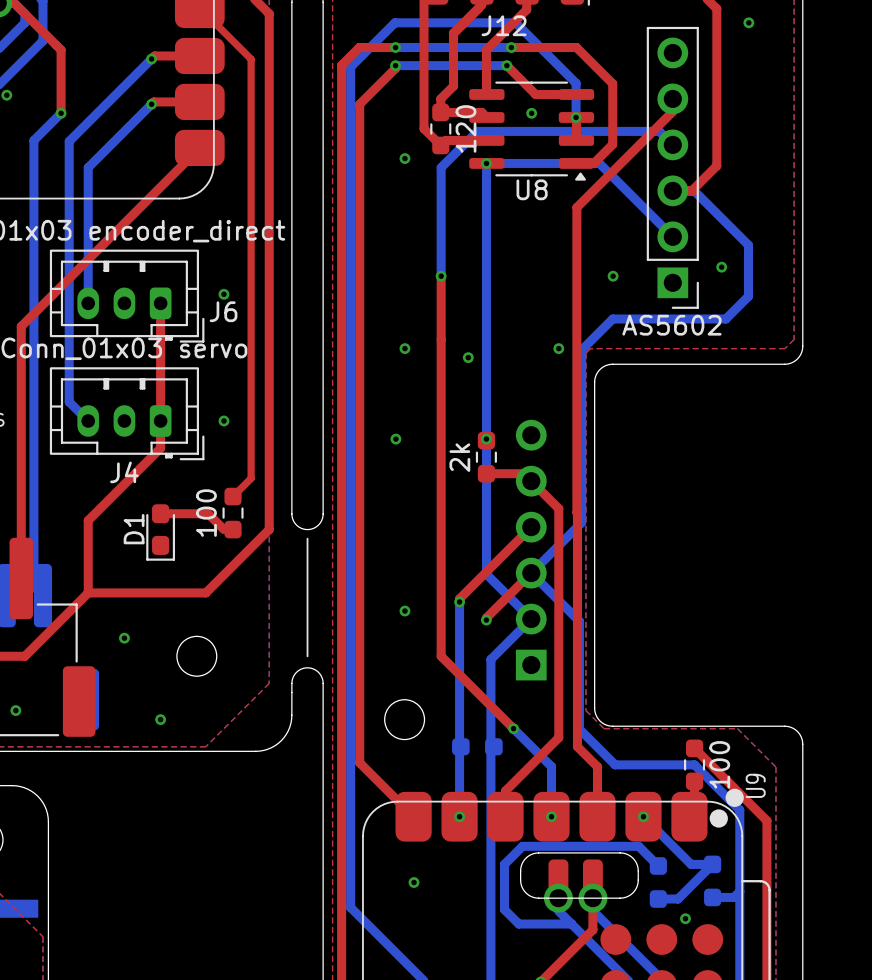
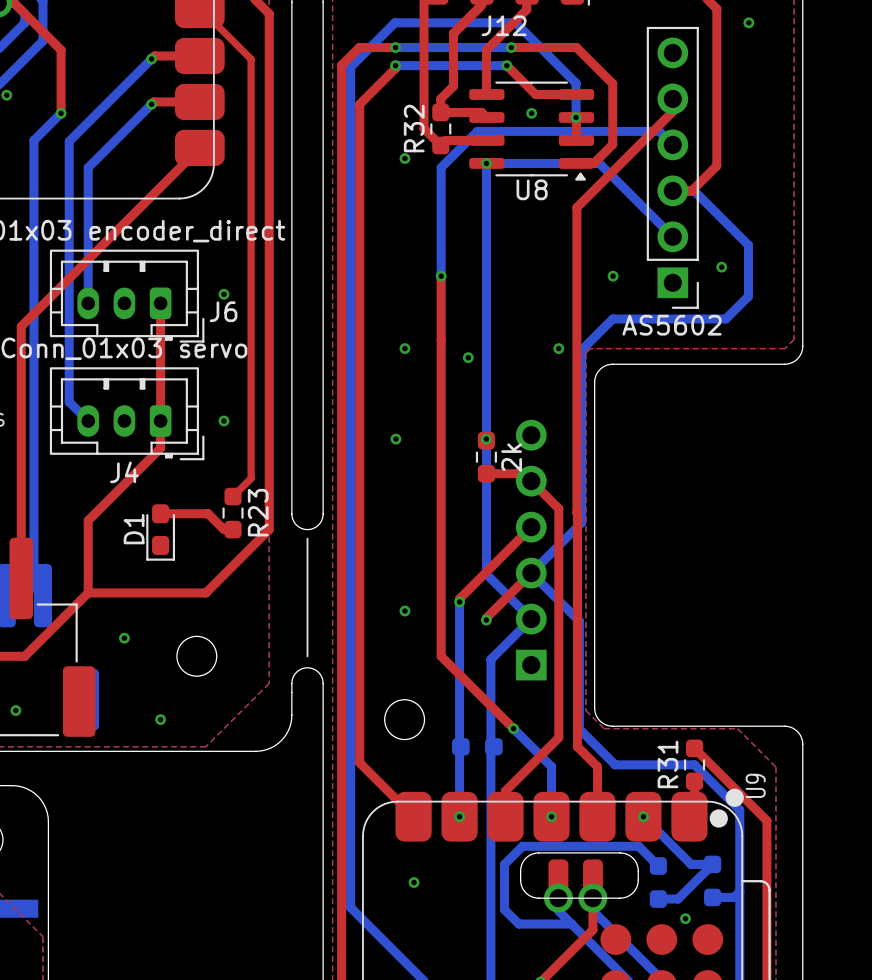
R32 name: none -> R32 (414, 128)
R32 value: 120 (466, 128) -> none
part value position: 2k (459, 457) -> 2k (511, 457)
R23 name: none -> R23 (258, 512)
R23 value: 100 (206, 513) -> none
R31 name: none -> R31 (667, 764)
R31 value: 100 (719, 764) -> none

